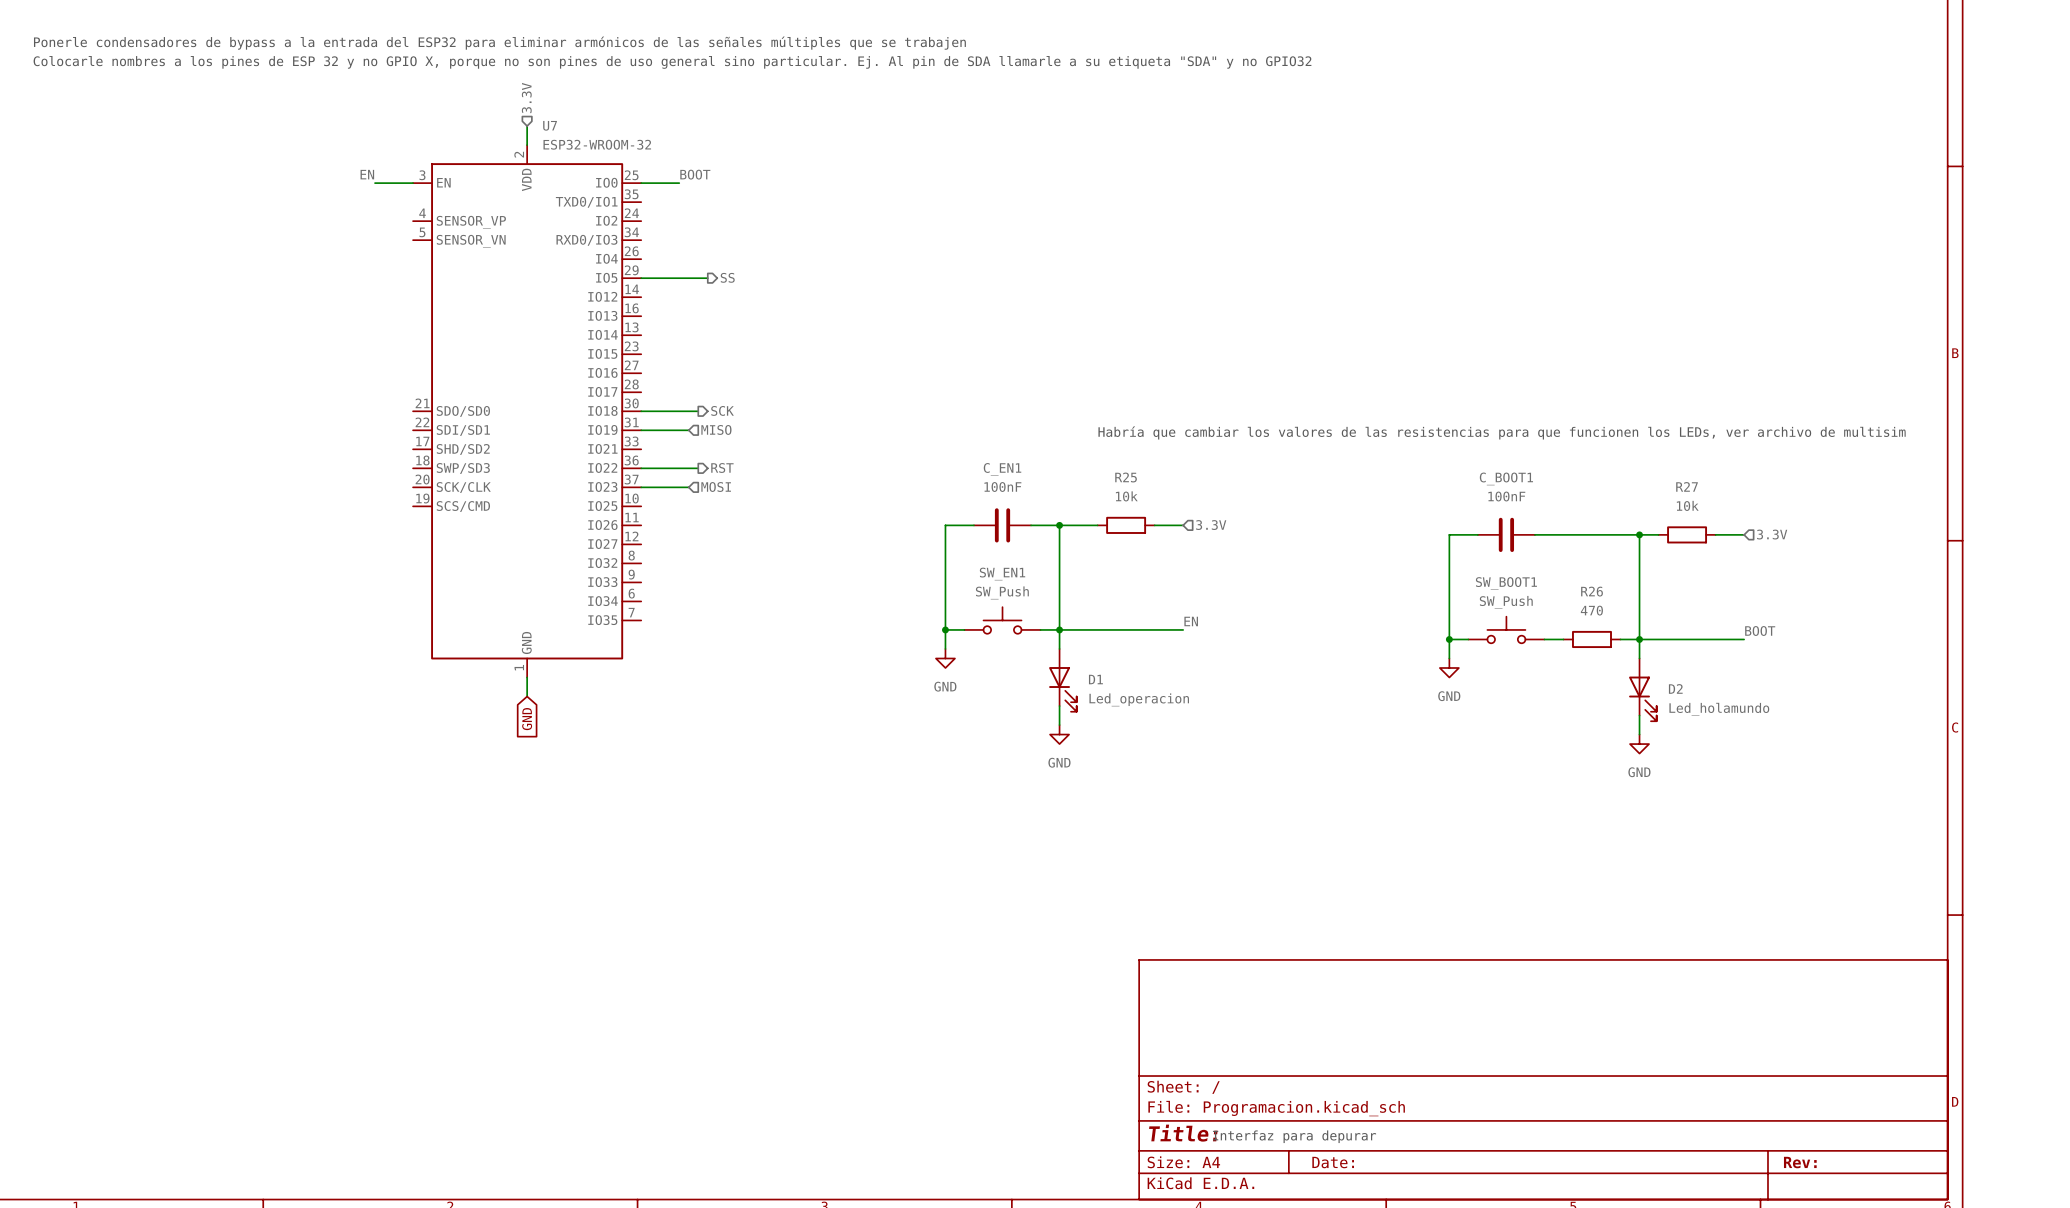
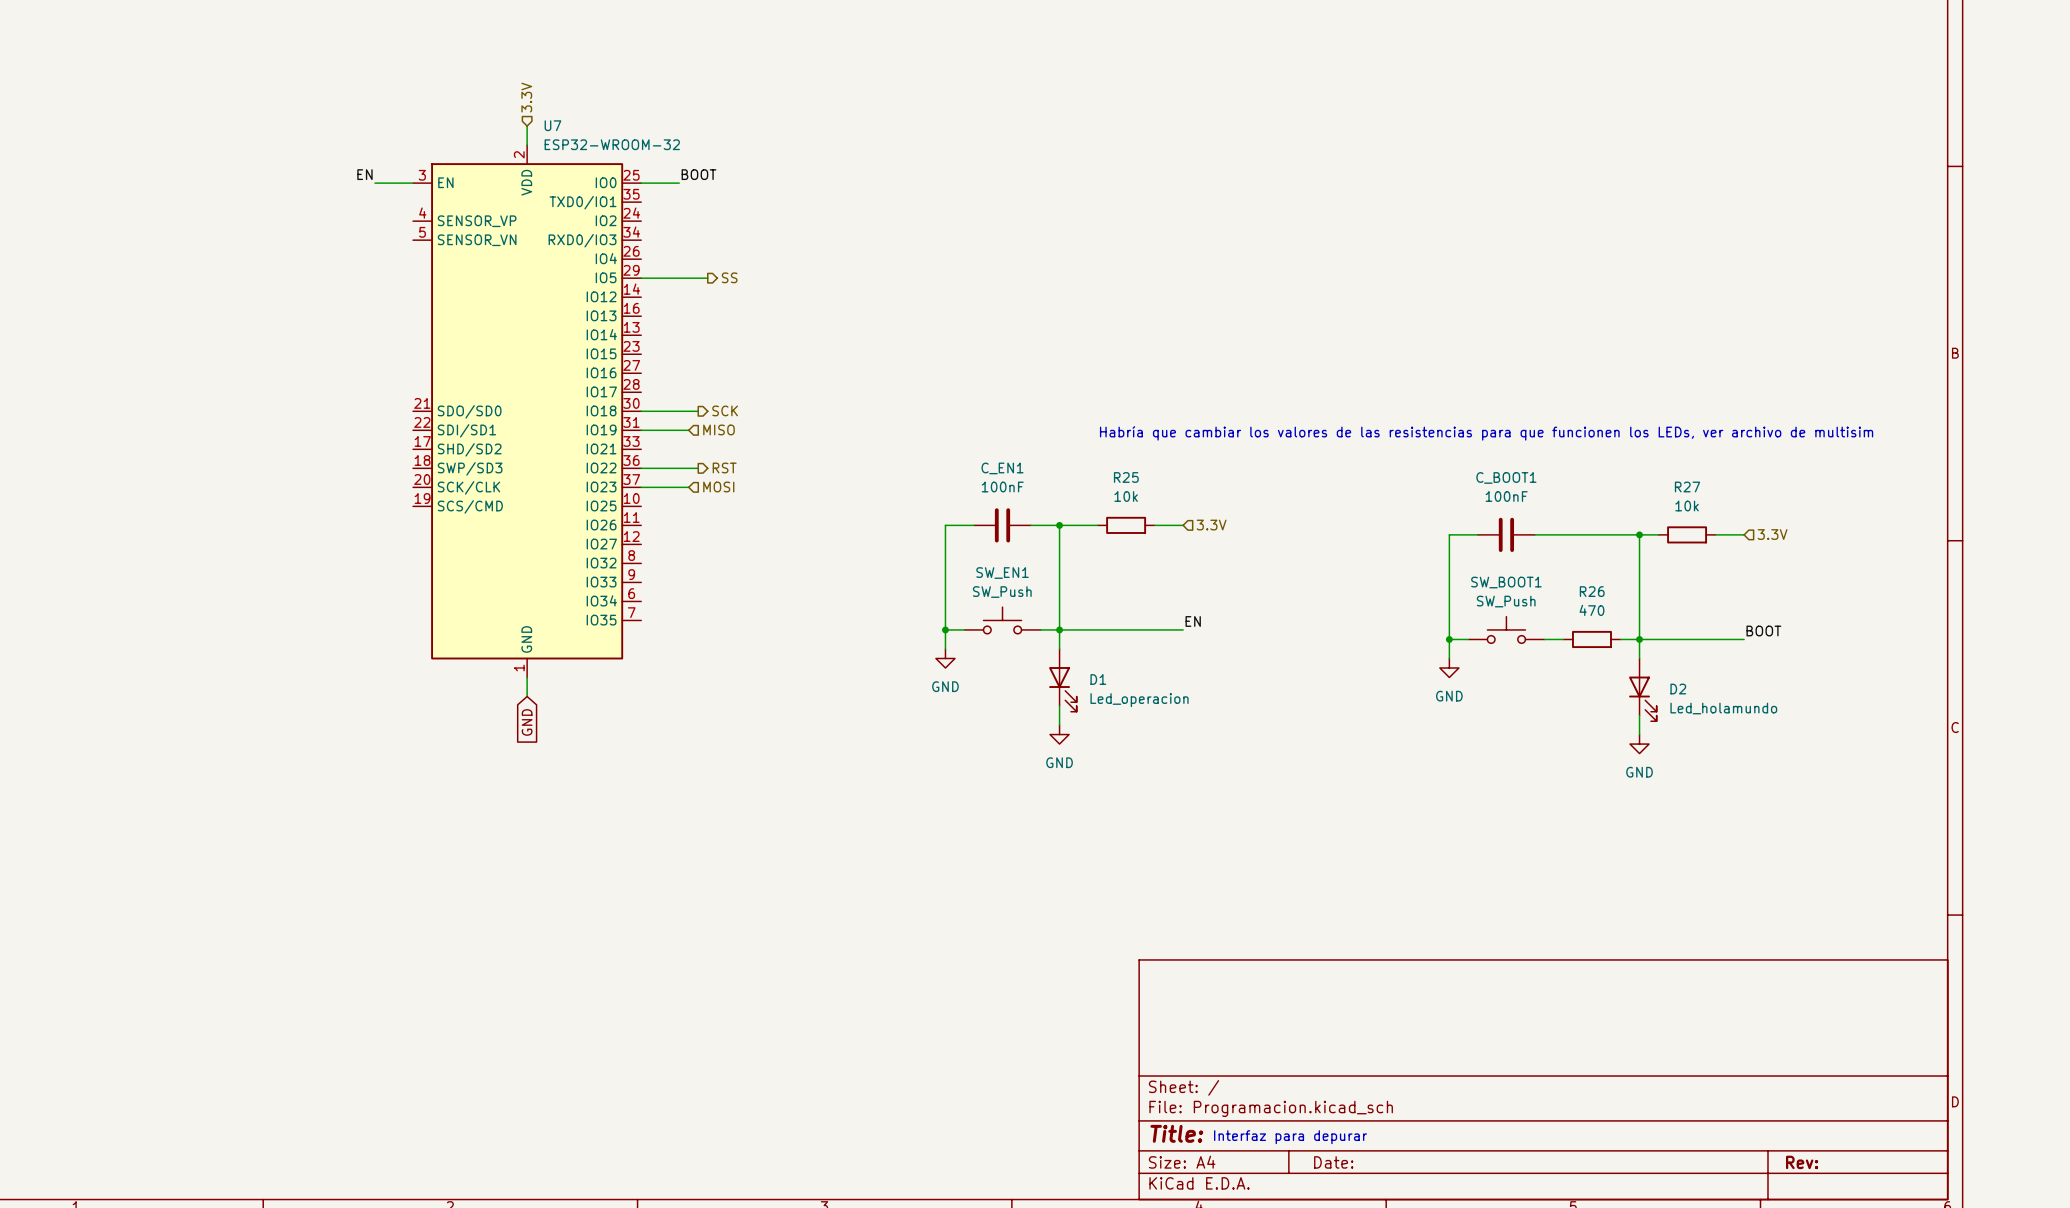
text: Ponerle condensadores de bypass a la entrada del ESP32 para eliminar armónicos de las señales múltiples que se trabajen (499, 43) -> none
text: Colocarle nombres a los pines de ESP 32 y no GPIO X, porque no son pines de uso general sino particular. Ej. Al pin de SDA llamarle a su etiqueta "SDA" y no GPIO32 (672, 62) -> none

